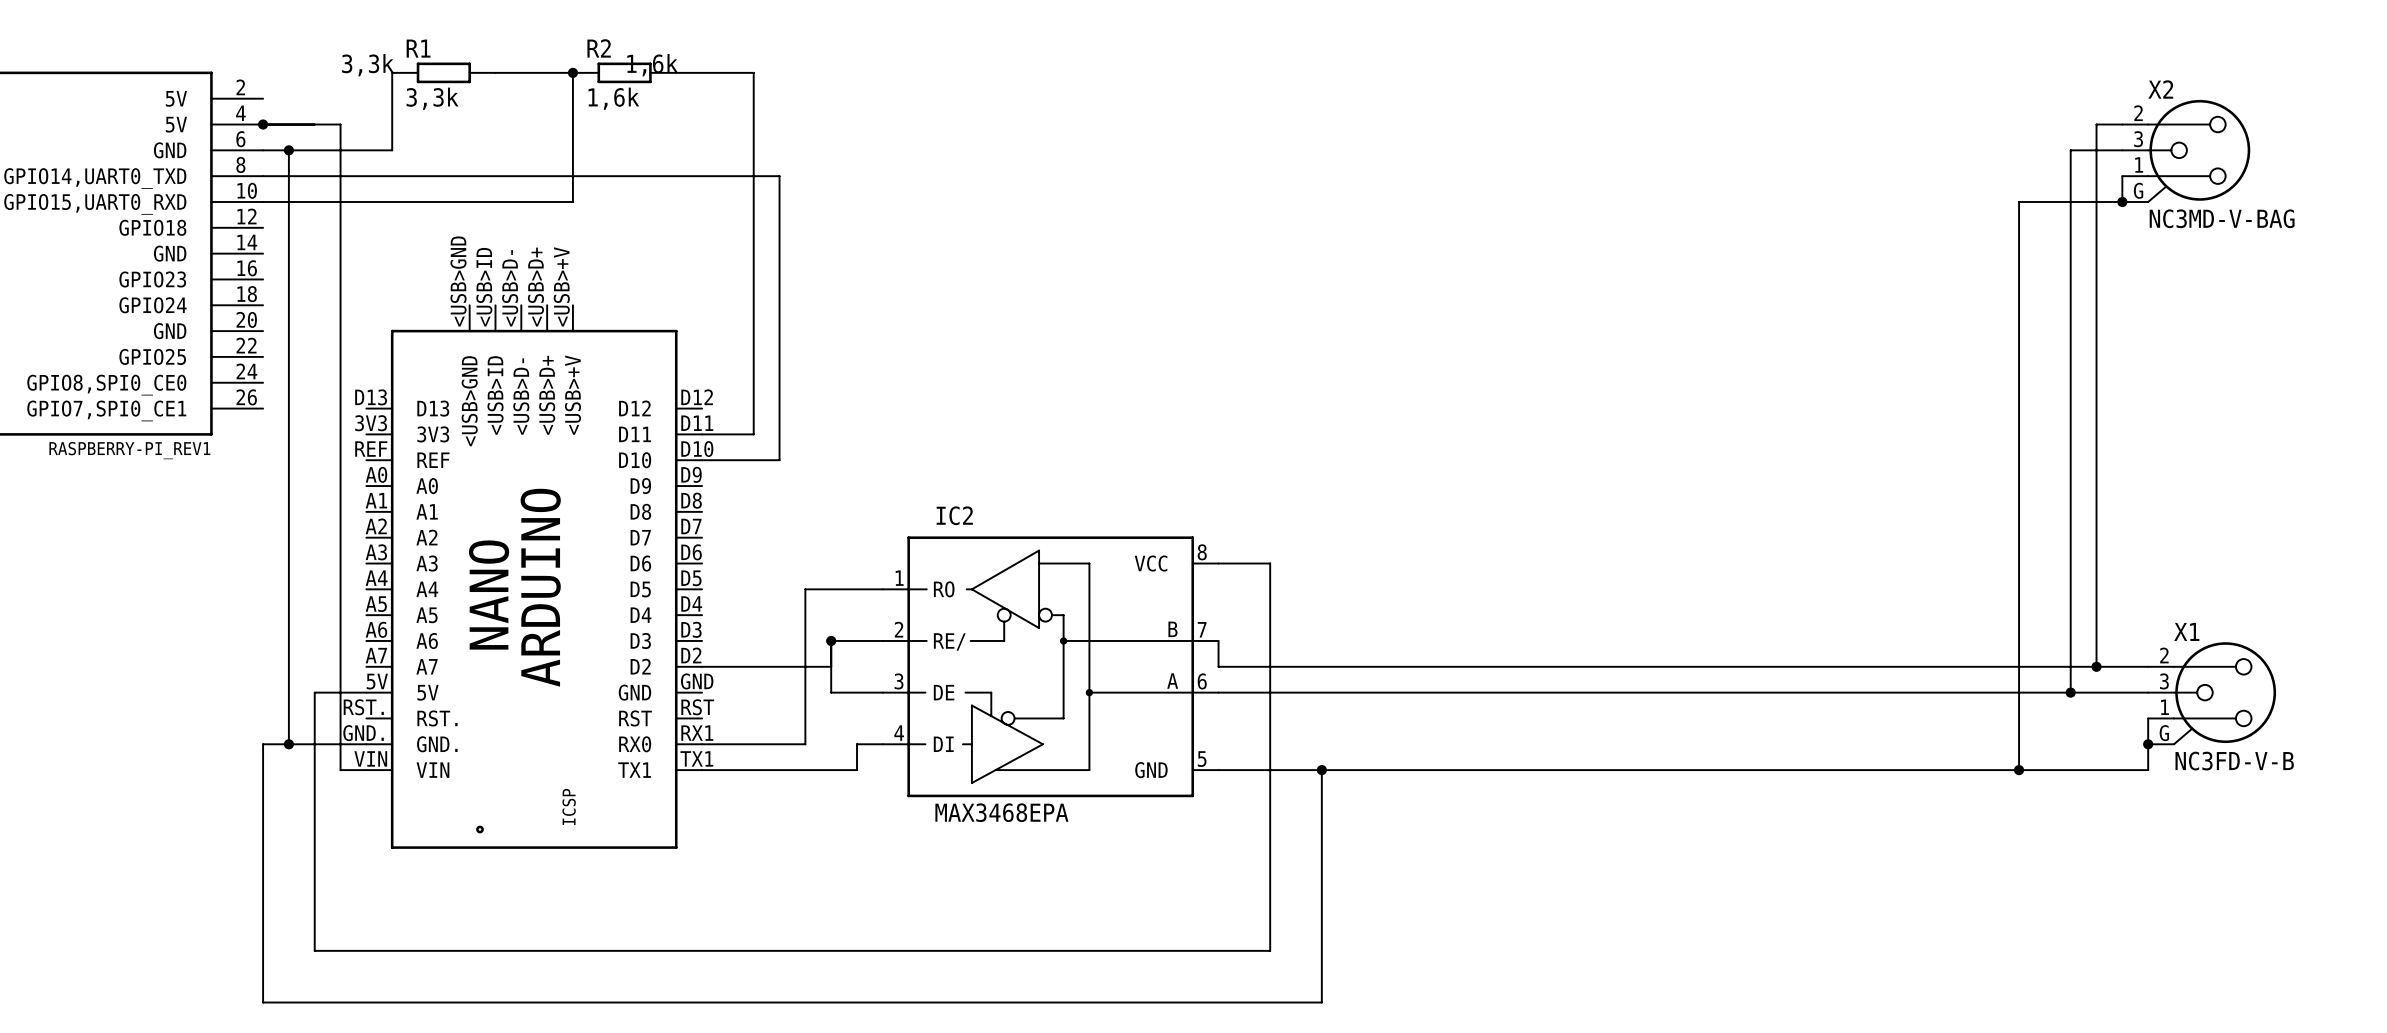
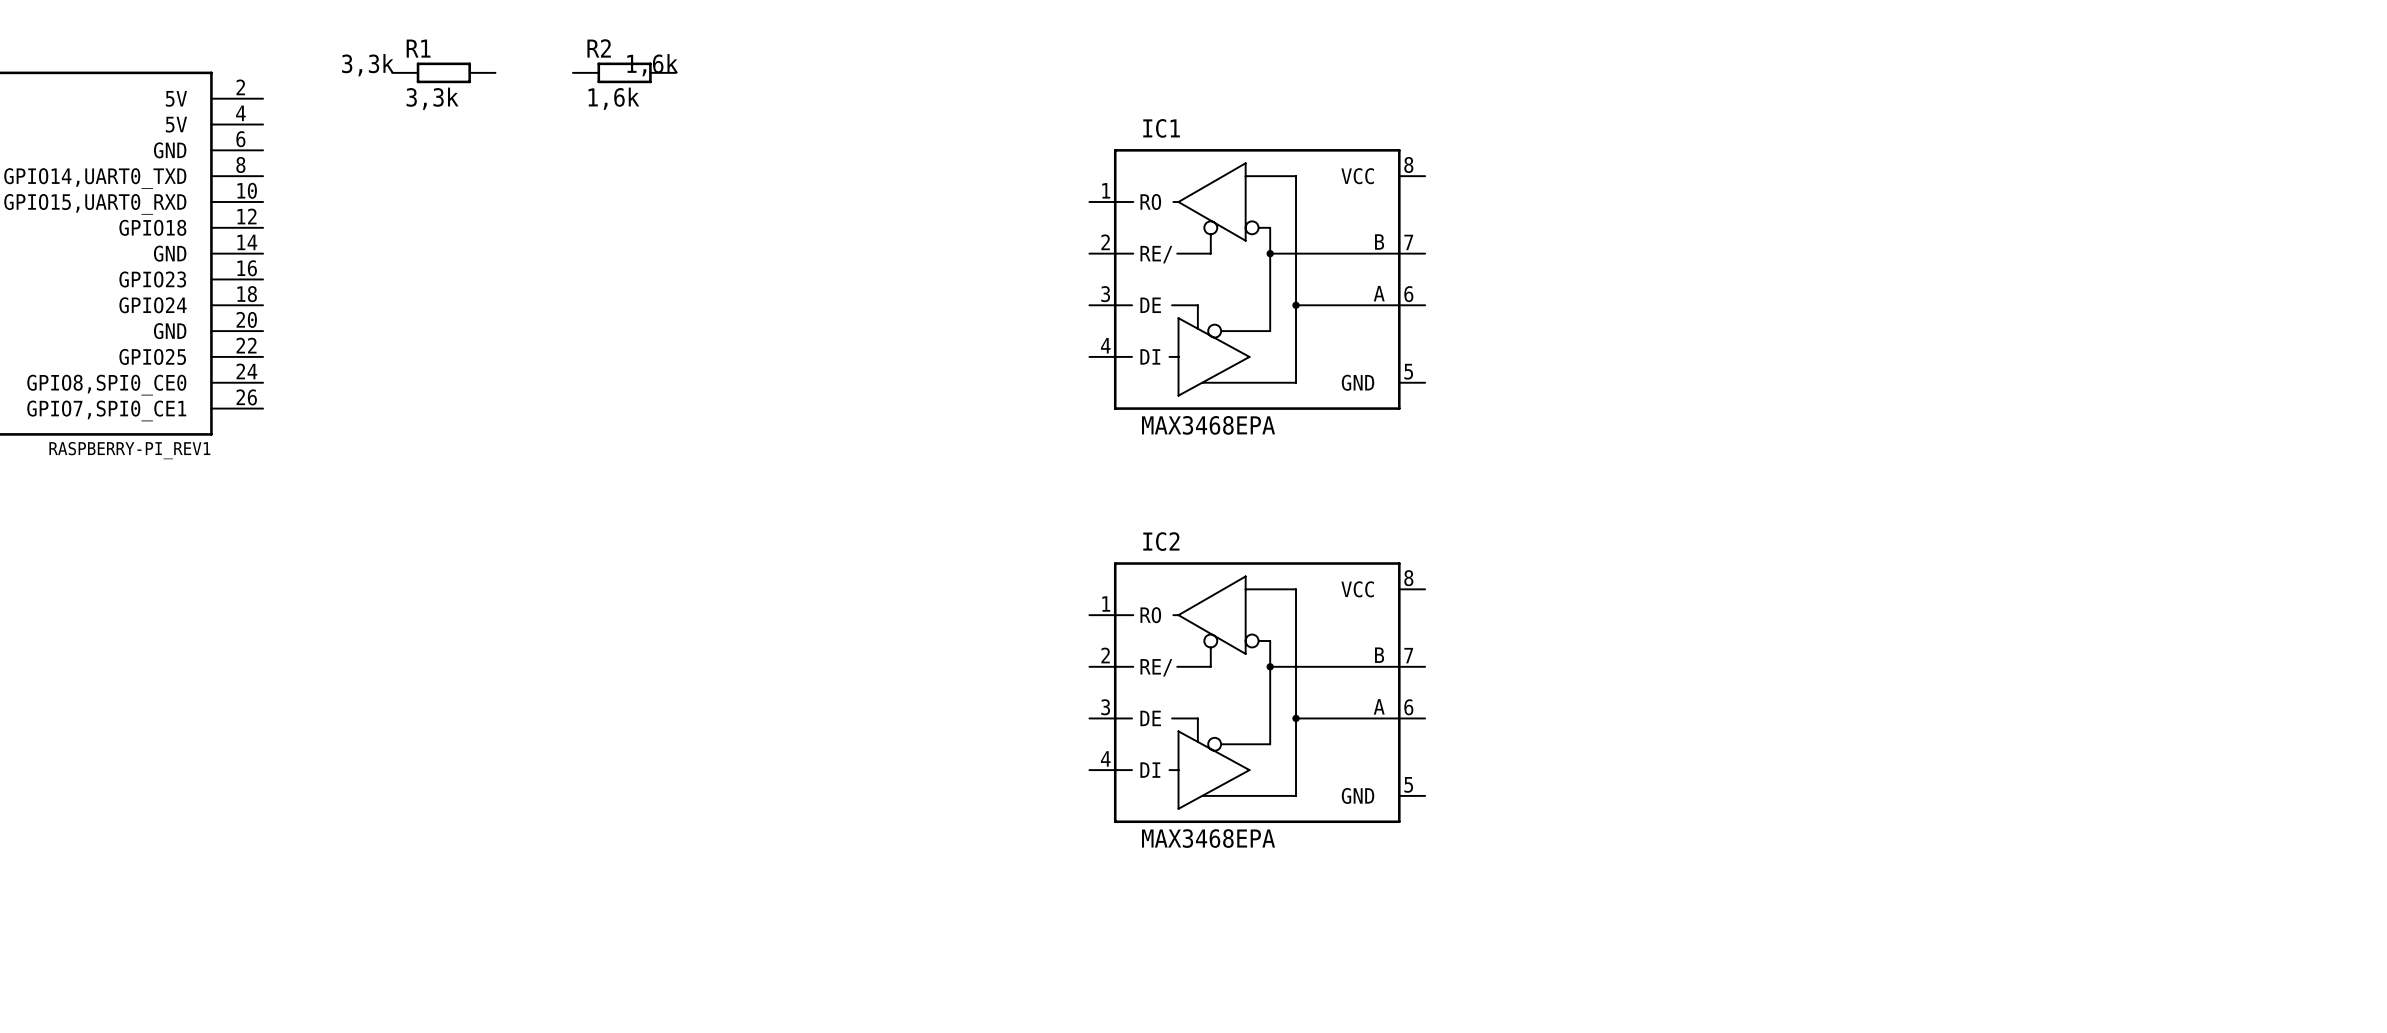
wire: (392, 72) (392, 150) (263, 150) -> none
wire: (495, 72) (572, 72) (572, 201) (263, 201) -> none
junction: (572, 72) -> none
wire: (676, 72) (753, 72) (753, 434) (702, 434) -> none
wire: (263, 124) (340, 124) (340, 770) (366, 770) -> none
junction: (263, 124) -> none
wire: (2122, 124) (2096, 124) (2096, 666) -> none
wire: (288, 150) (288, 744) -> none
junction: (288, 150) -> none
wire: (2122, 150) (2070, 150) (2070, 692) -> none
X2: NC3MD-V-BAG (2186, 151) -> none
wire: (263, 176) (779, 176) (779, 460) (702, 460) -> none
wire: (2122, 176) (2122, 201) (2019, 201) (2019, 770) -> none
junction: (2122, 201) -> none
IC1: none -> MAX3468EPA (1257, 279)
wire: (1218, 563) (1270, 563) (1270, 950) (314, 950) (314, 692) (366, 692) -> none
part: (534, 577) -> none
wire: (882, 589) (805, 589) (805, 744) (702, 744) -> none
junction: (831, 640) -> none
wire: (882, 640) (831, 640) (831, 692) (882, 692) -> none
wire: (1218, 640) (1218, 666) (2148, 666) -> none
wire: (702, 666) (831, 666) -> none
IC2 position: (1050, 666) -> (1257, 692)
junction: (2096, 666) -> none
wire: (1218, 692) (2148, 692) -> none
junction: (2070, 692) -> none
X1: NC3FD-V-B (2212, 693) -> none
wire: (2148, 718) (2148, 770) (1218, 770) -> none
junction: (288, 744) -> none
wire: (366, 744) (263, 744) (263, 1002) (1321, 1002) (1321, 770) -> none
wire: (882, 744) (857, 744) (857, 770) (702, 770) -> none
junction: (2148, 744) -> none
junction: (1321, 770) -> none
junction: (2019, 770) -> none

